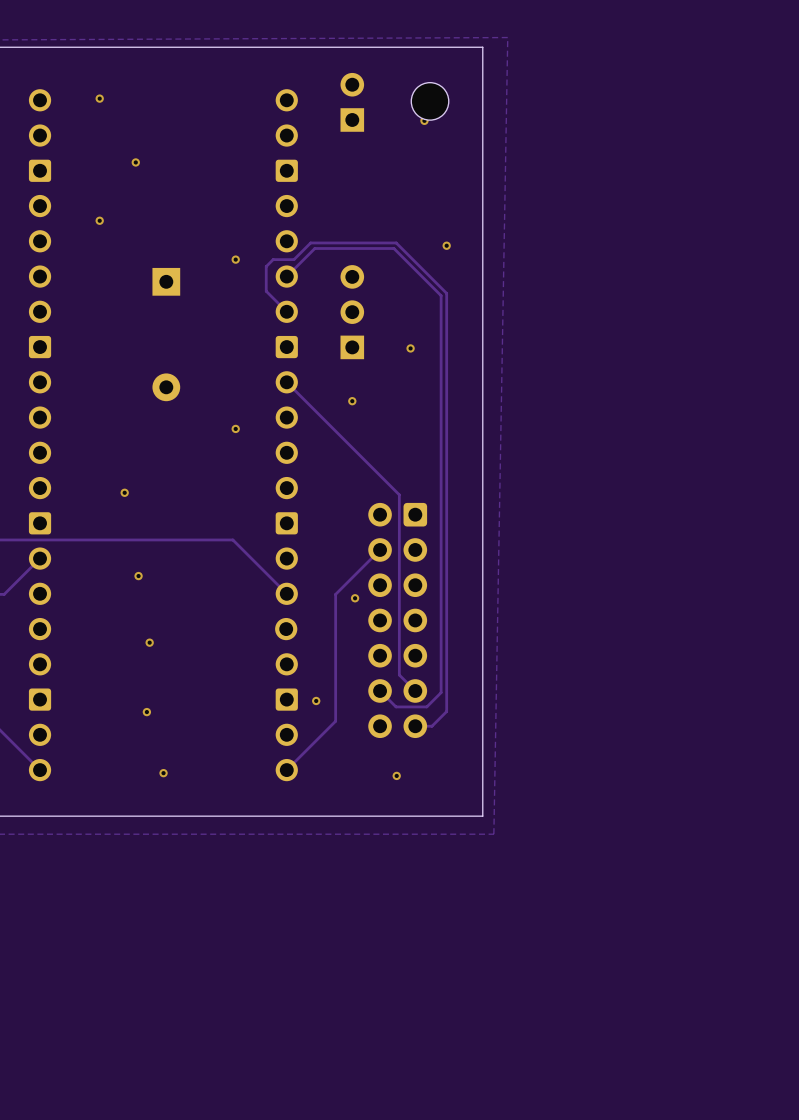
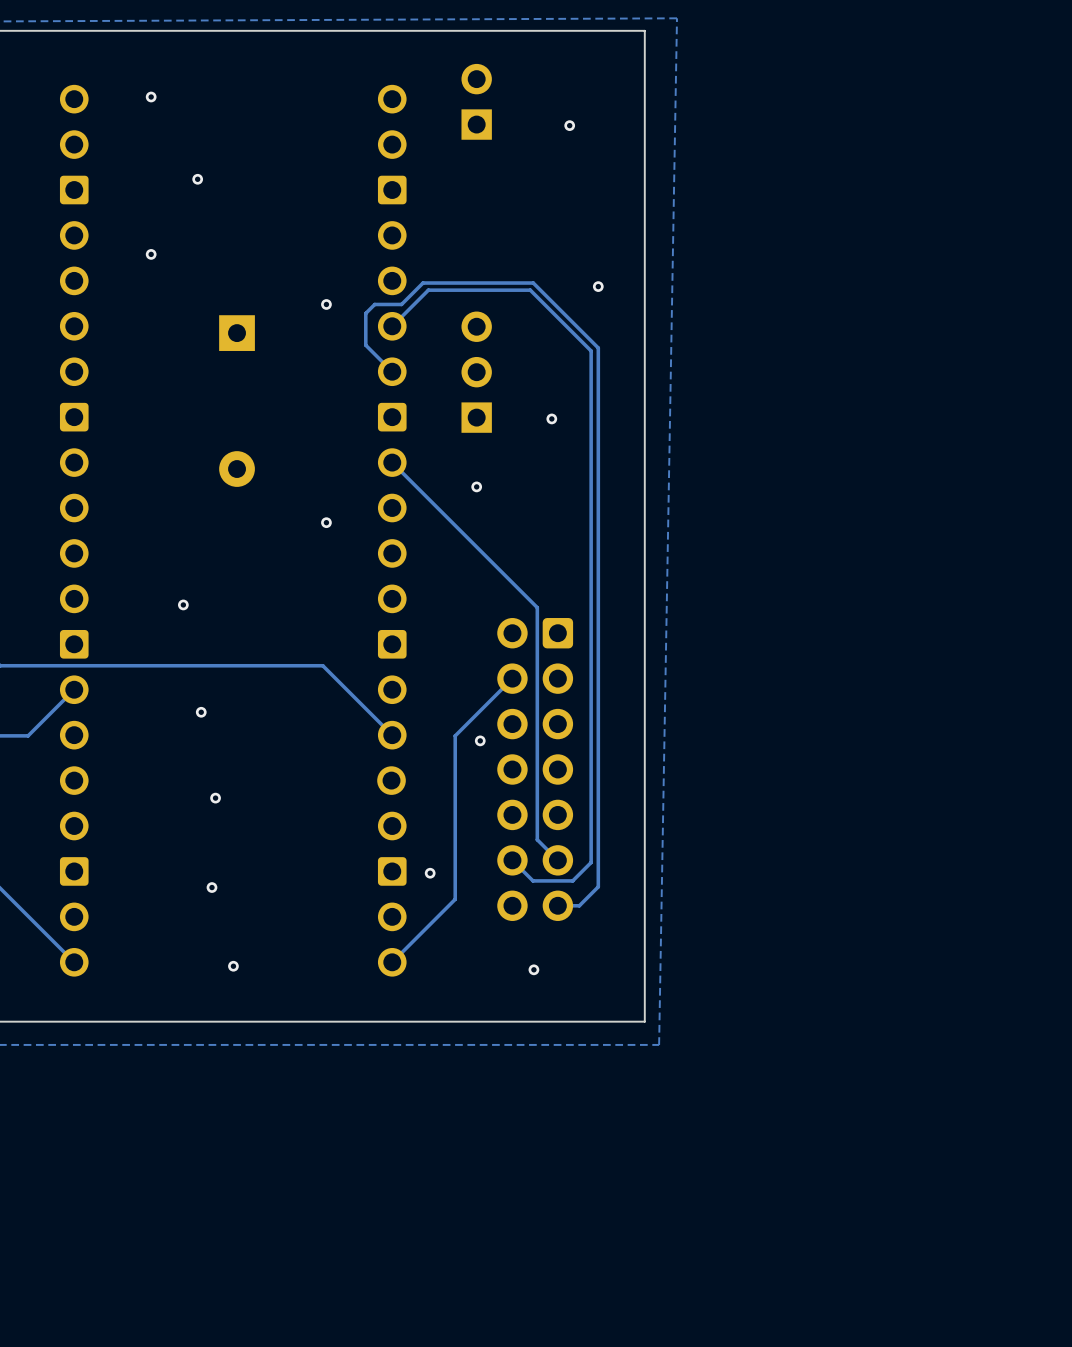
part: (430, 101) -> none

